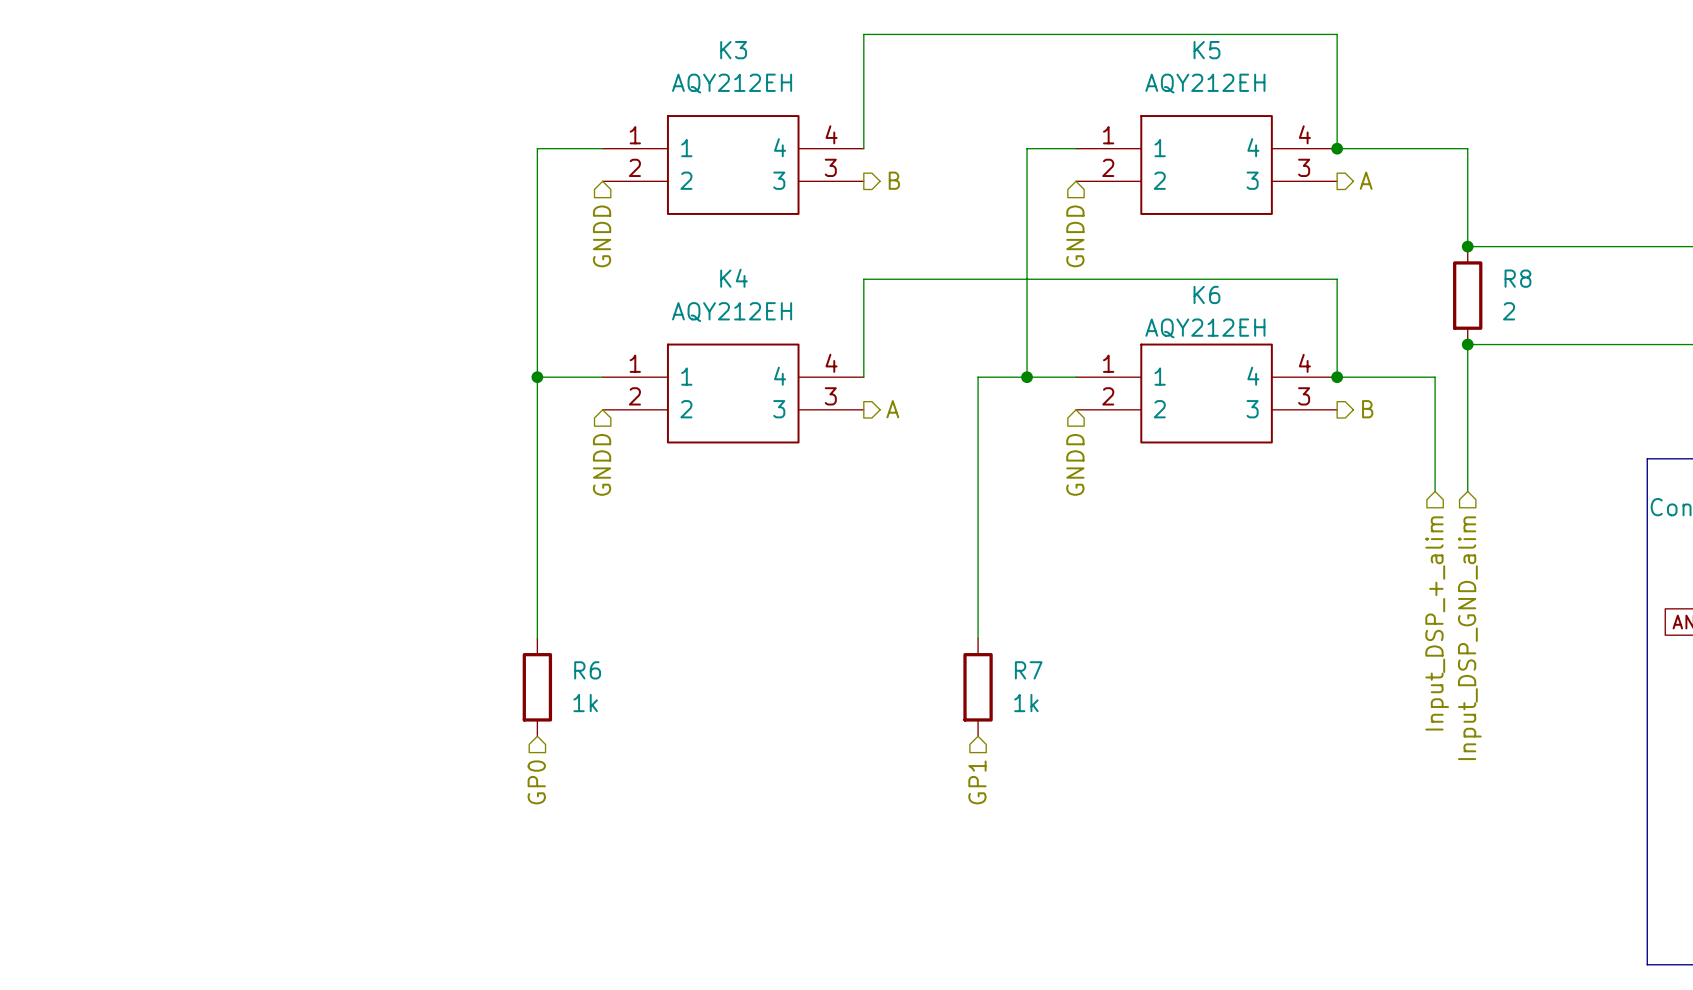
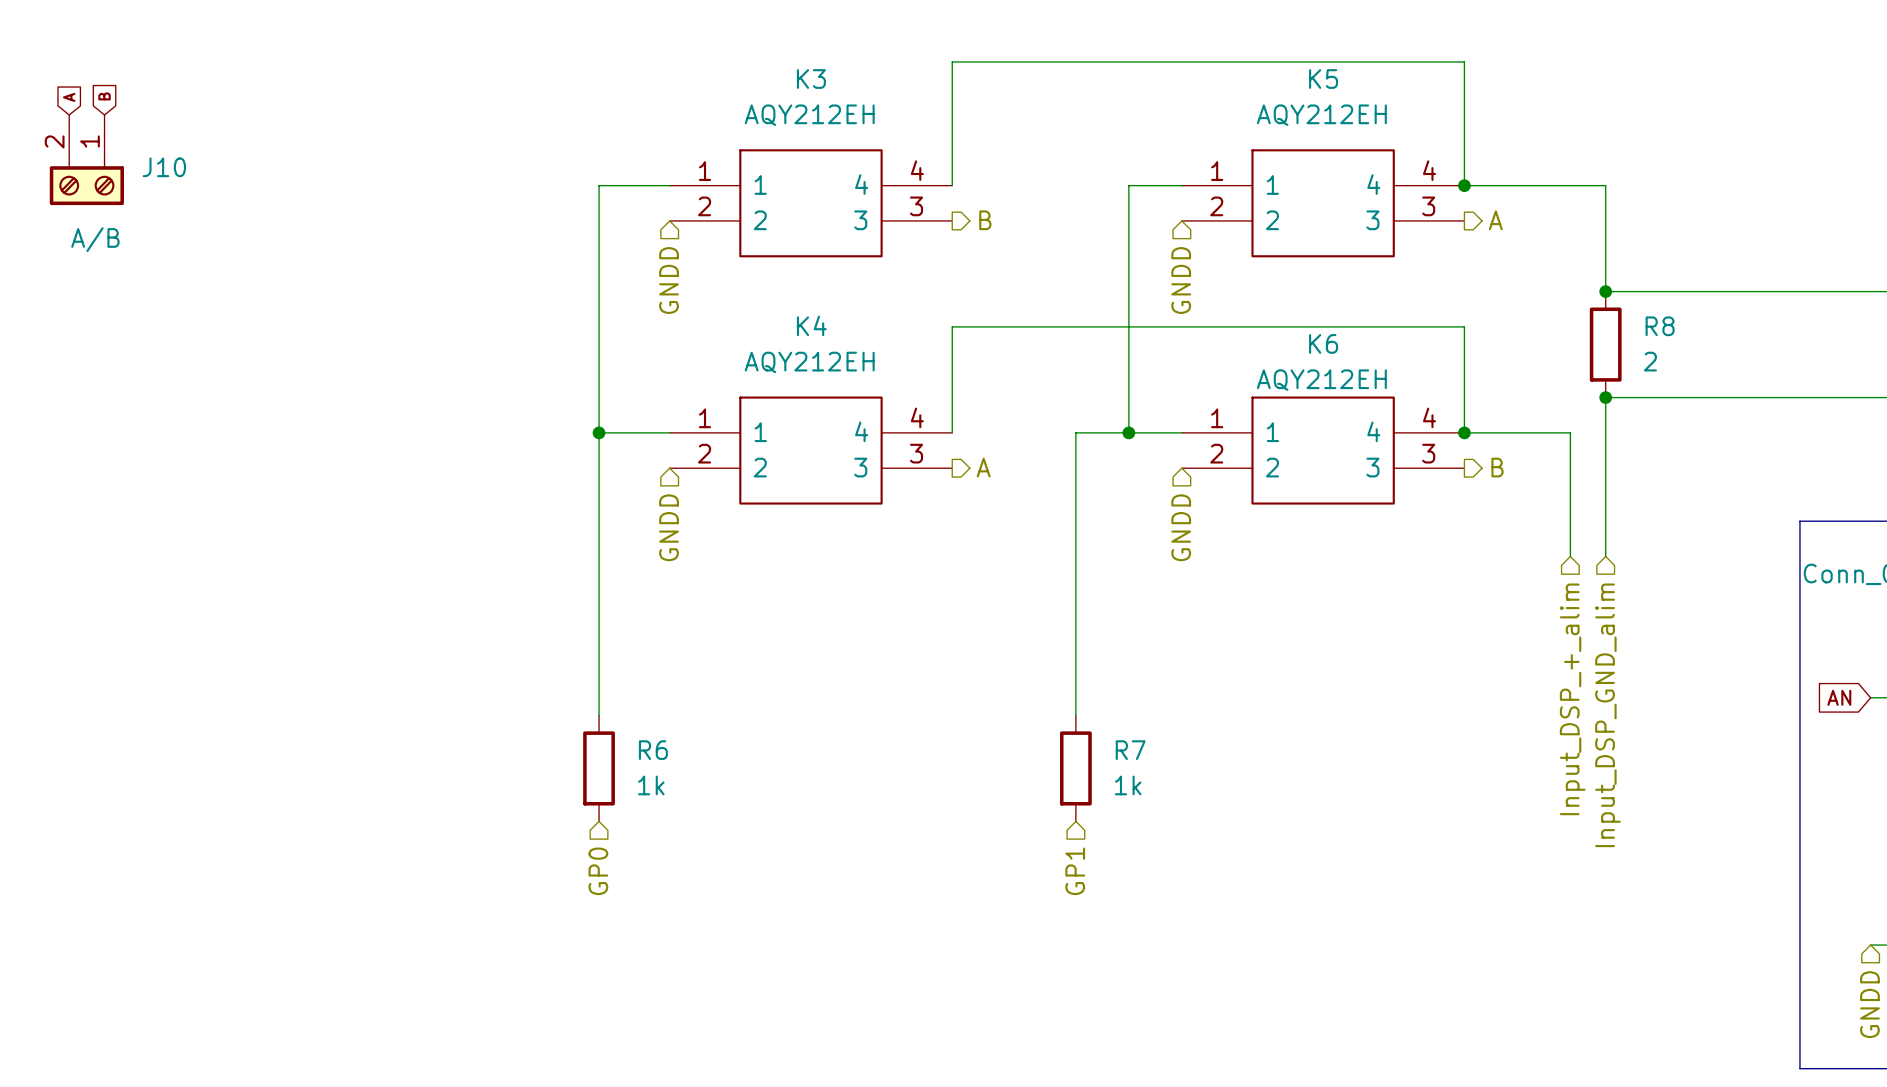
global label: none -> B (104, 96)
global label: none -> A (69, 97)
J10: none -> A/B (86, 160)

